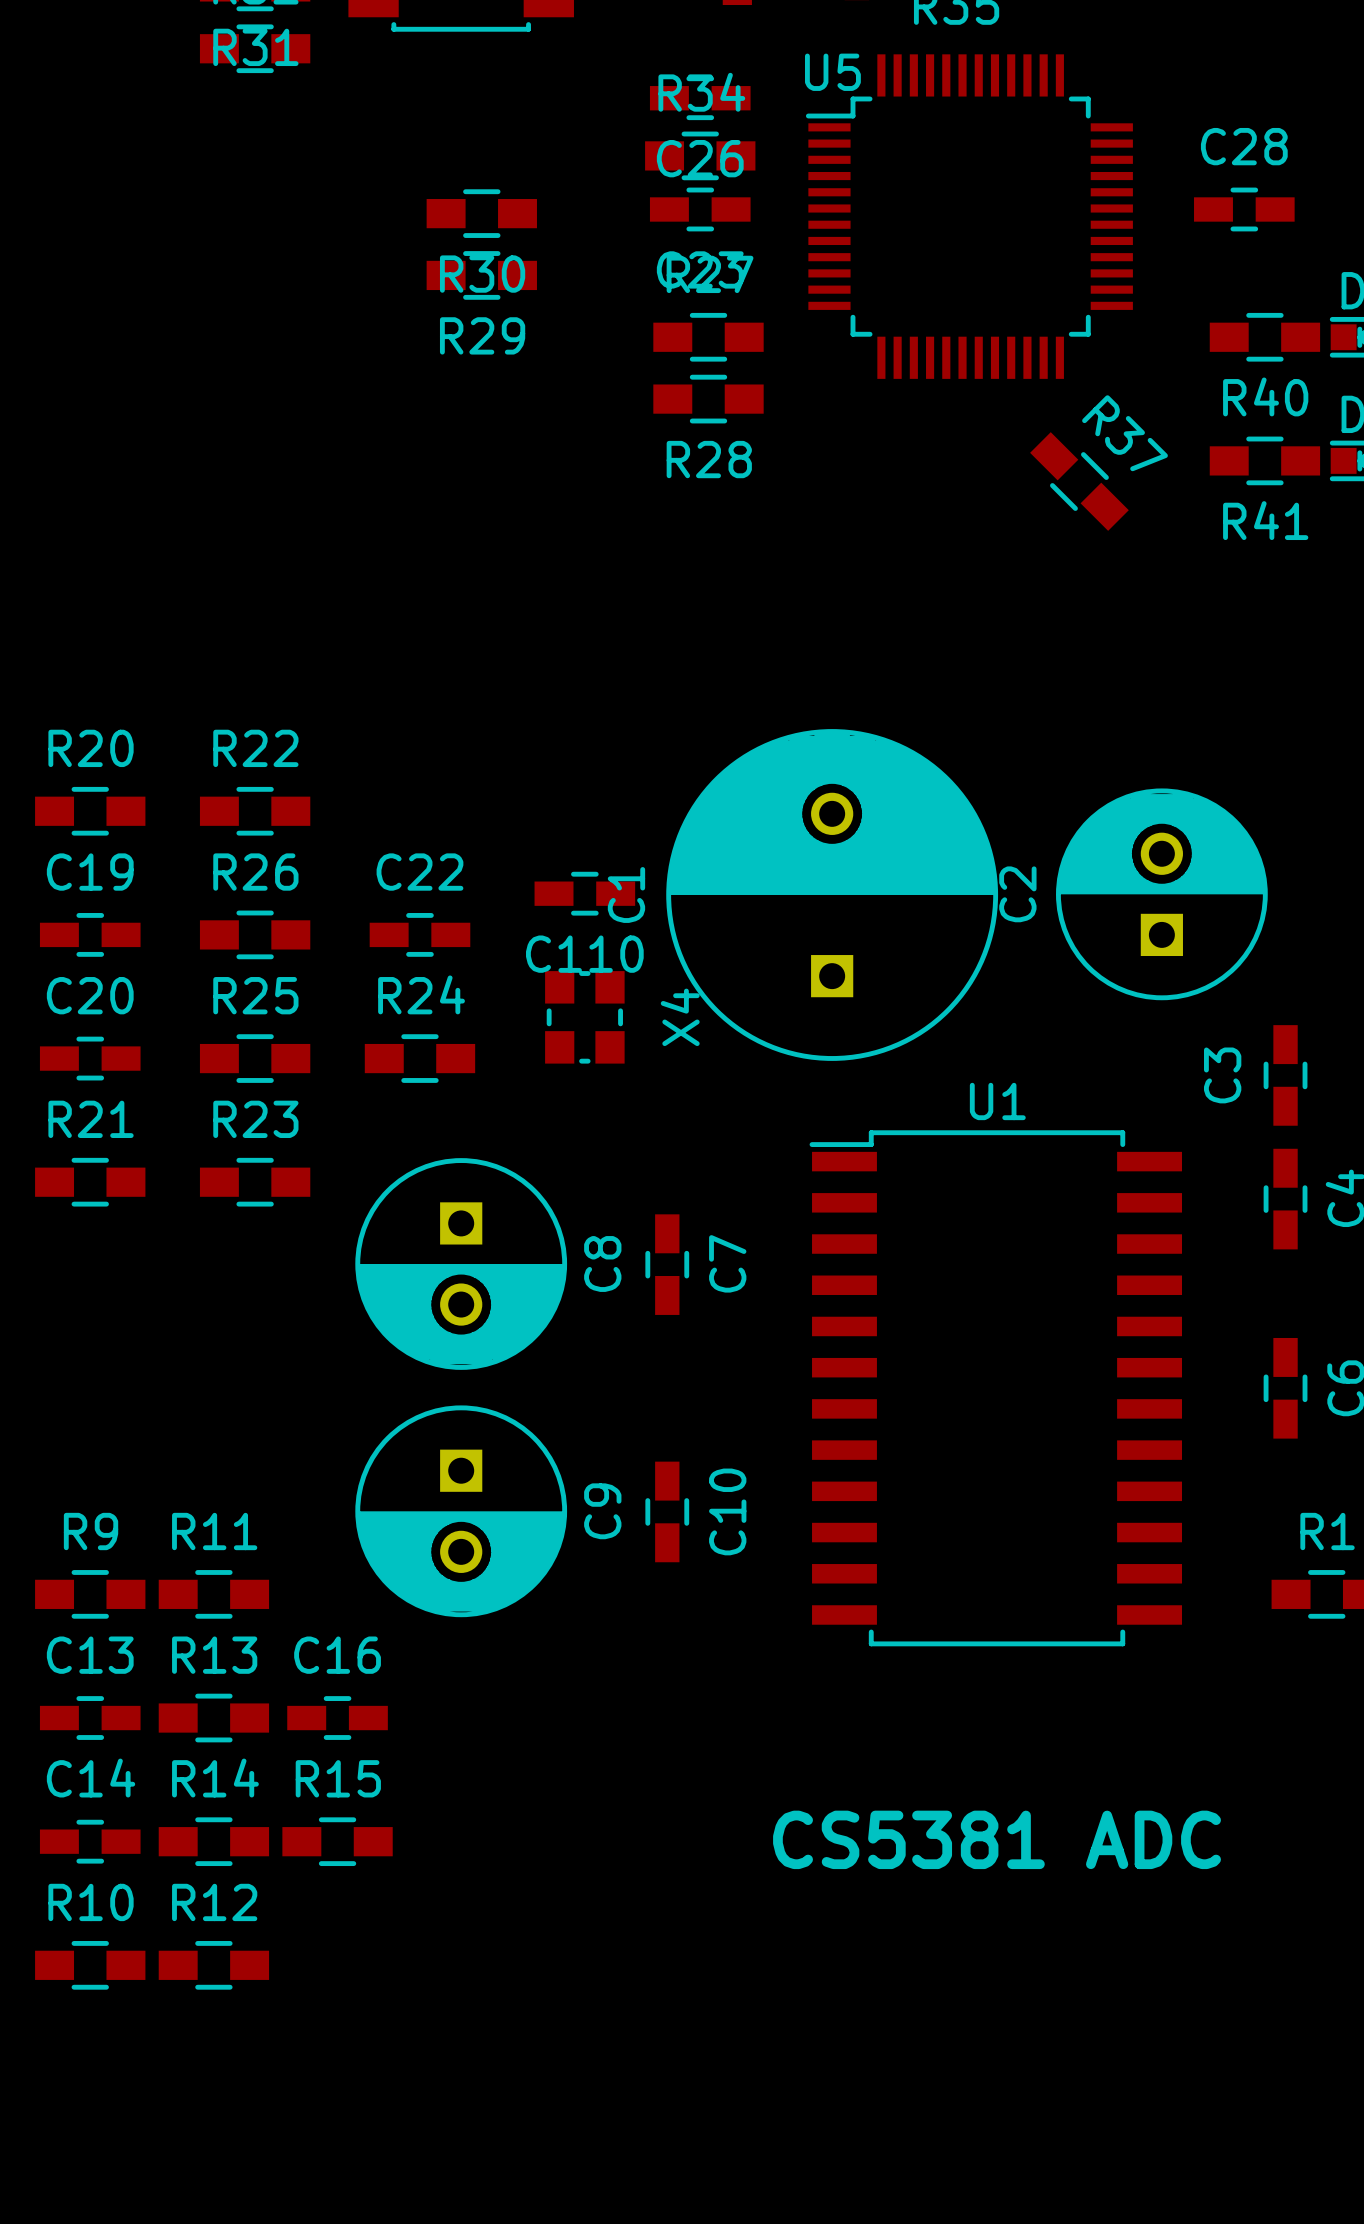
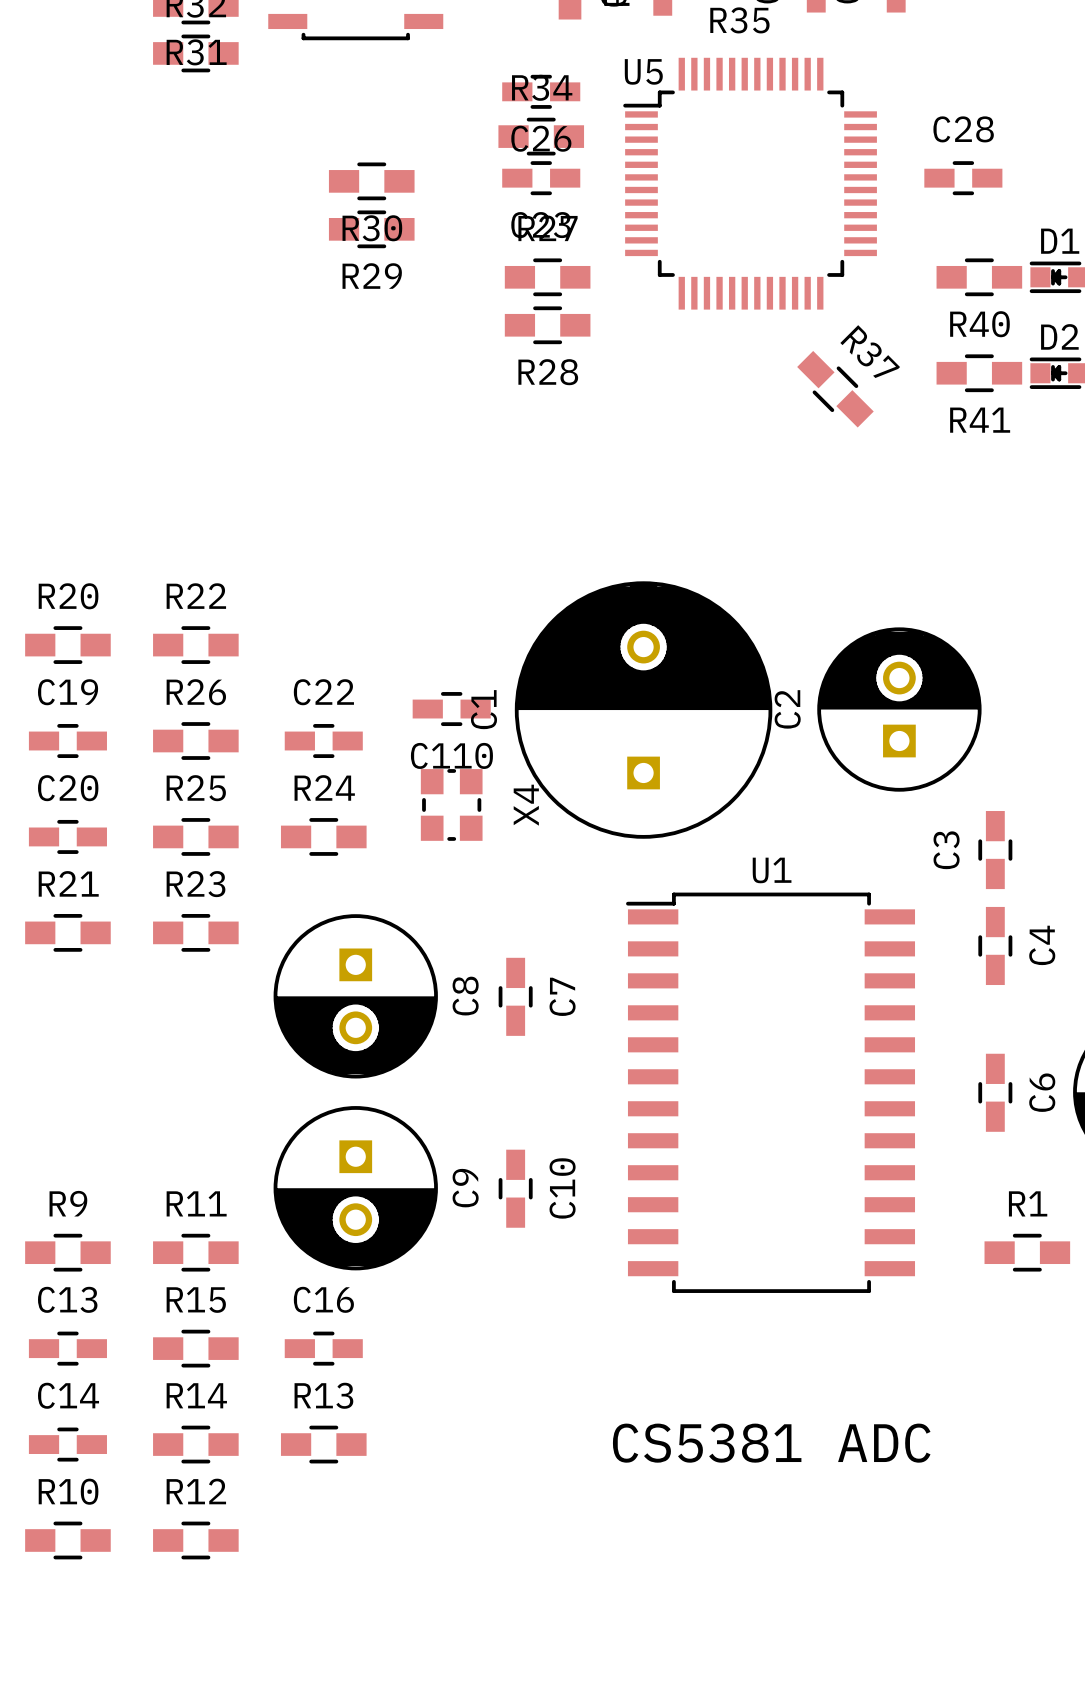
R11 position: (213, 1594) -> (195, 1252)
R13 position: (213, 1718) -> (323, 1444)
C16 position: (337, 1718) -> (323, 1348)
R14 position: (213, 1841) -> (195, 1444)
R15 position: (337, 1841) -> (195, 1348)
R12 position: (213, 1965) -> (195, 1540)

